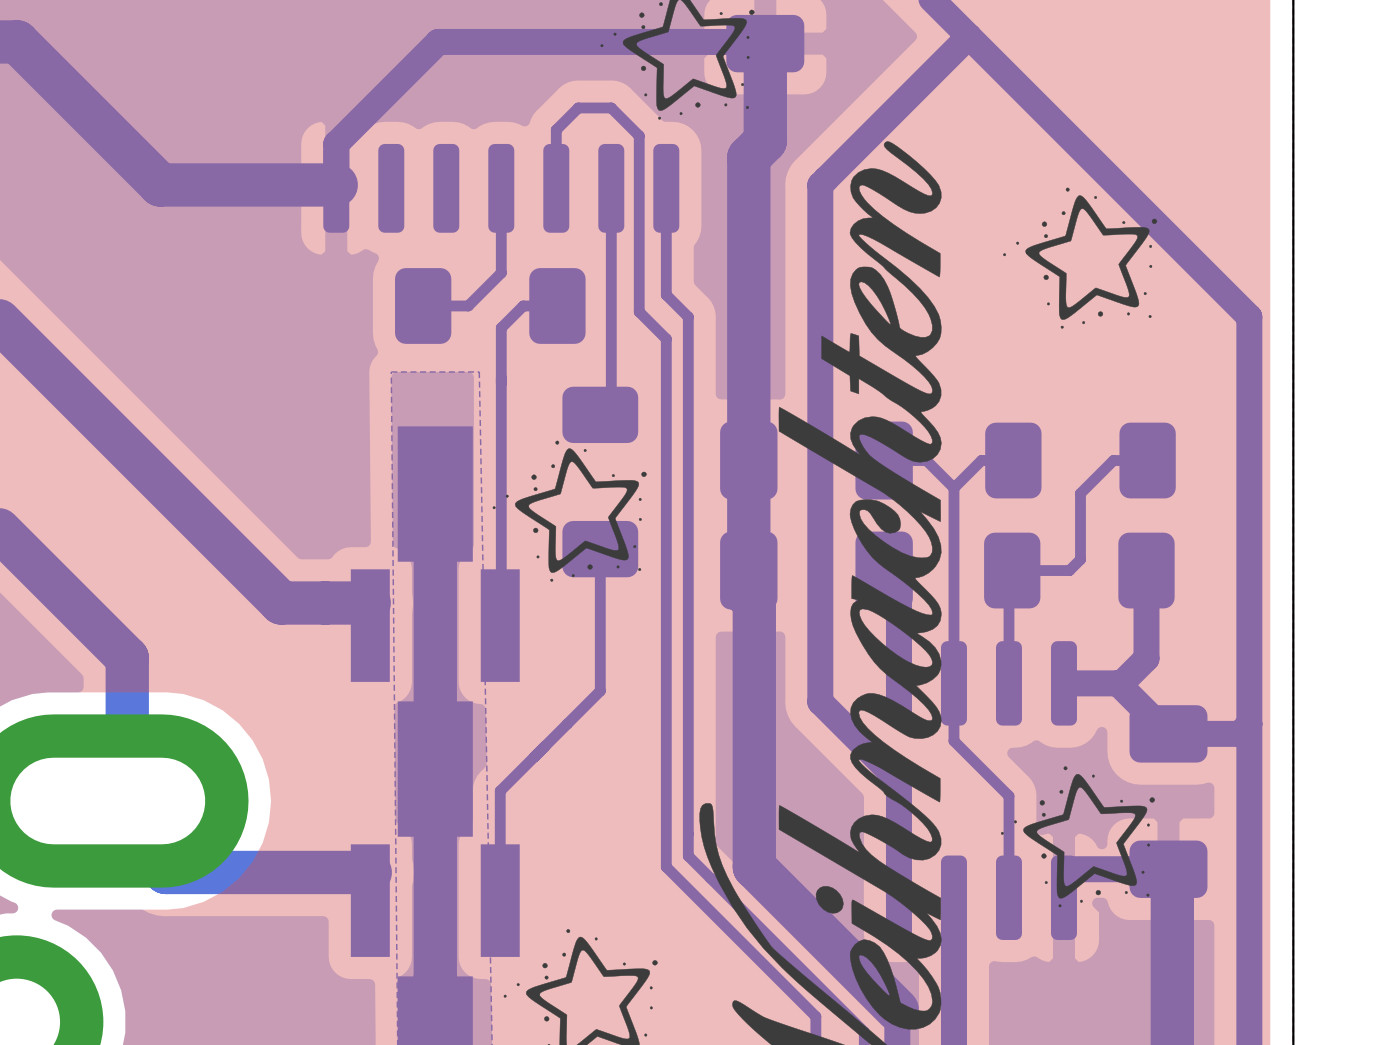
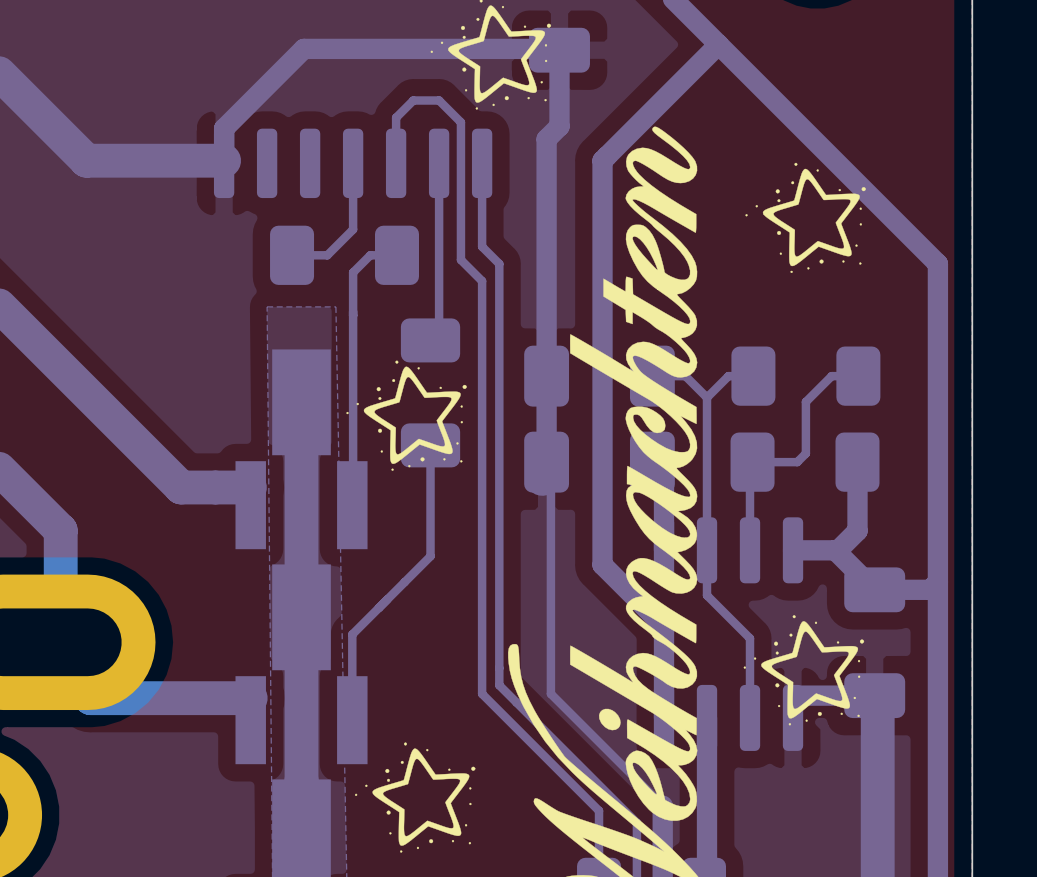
bottom track width: thick (765, 41) (765, 140) (748, 157) (748, 570) -> thin (559, 48) (559, 126) (546, 139) (546, 462)
bottom track width: thick (754, 570) (754, 867) (897, 1010) -> thin (550, 461) (550, 693) (662, 805)

